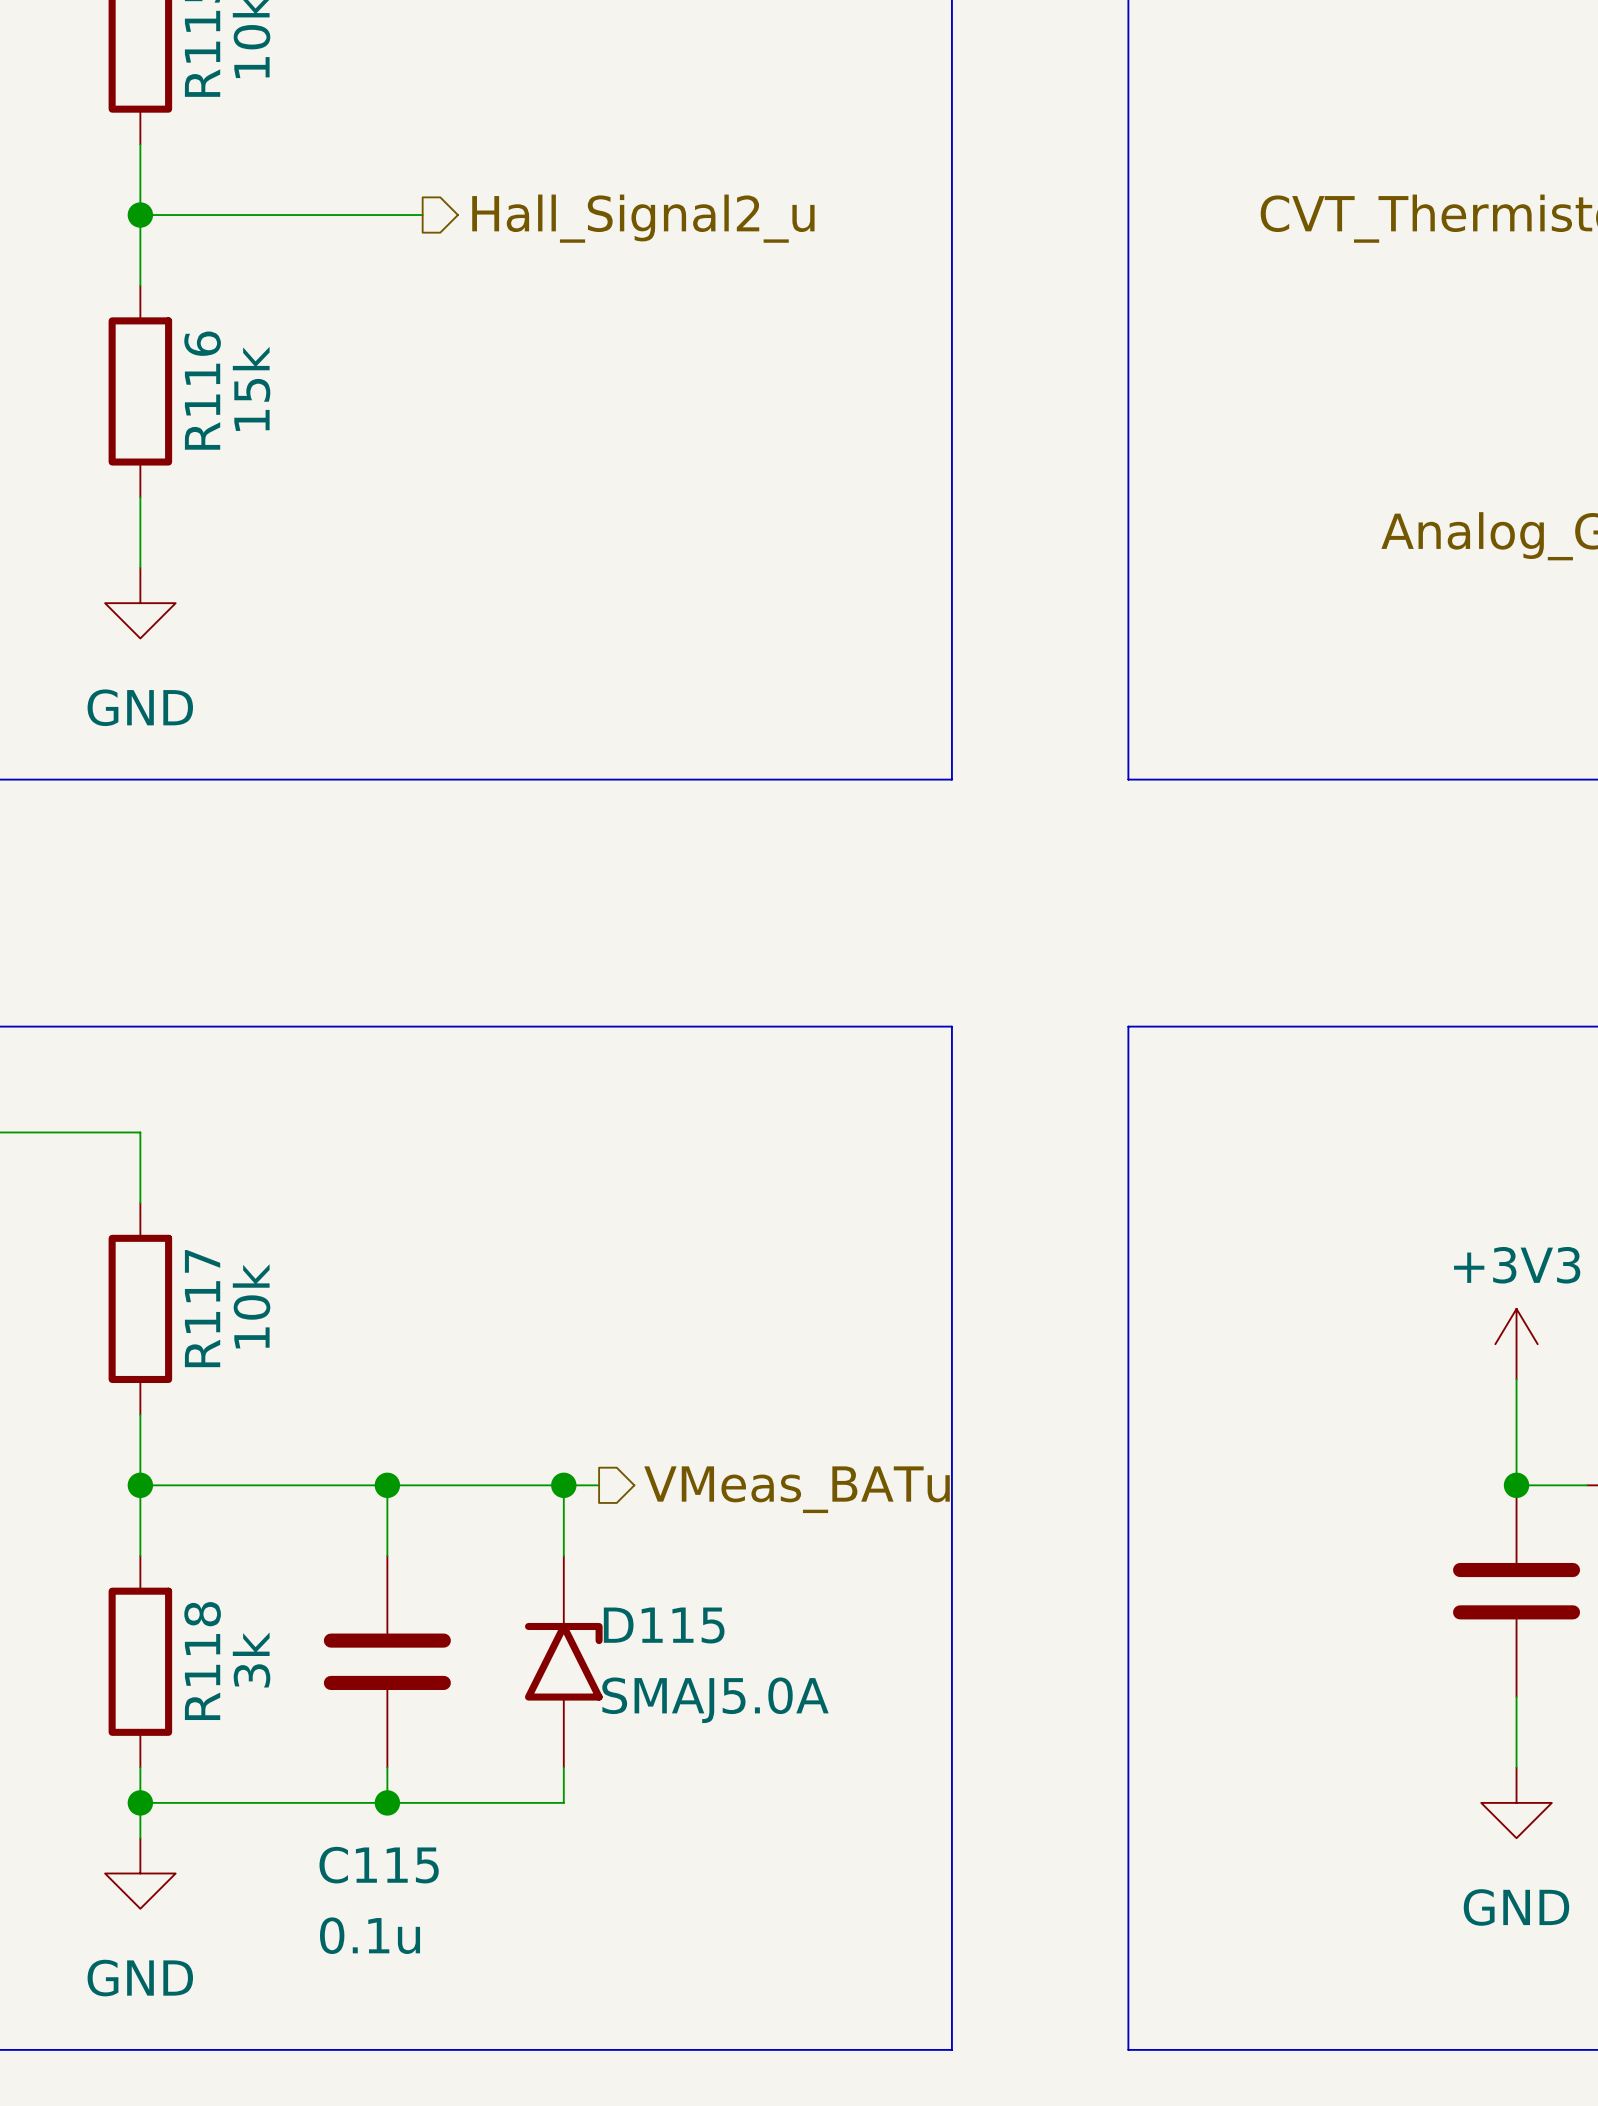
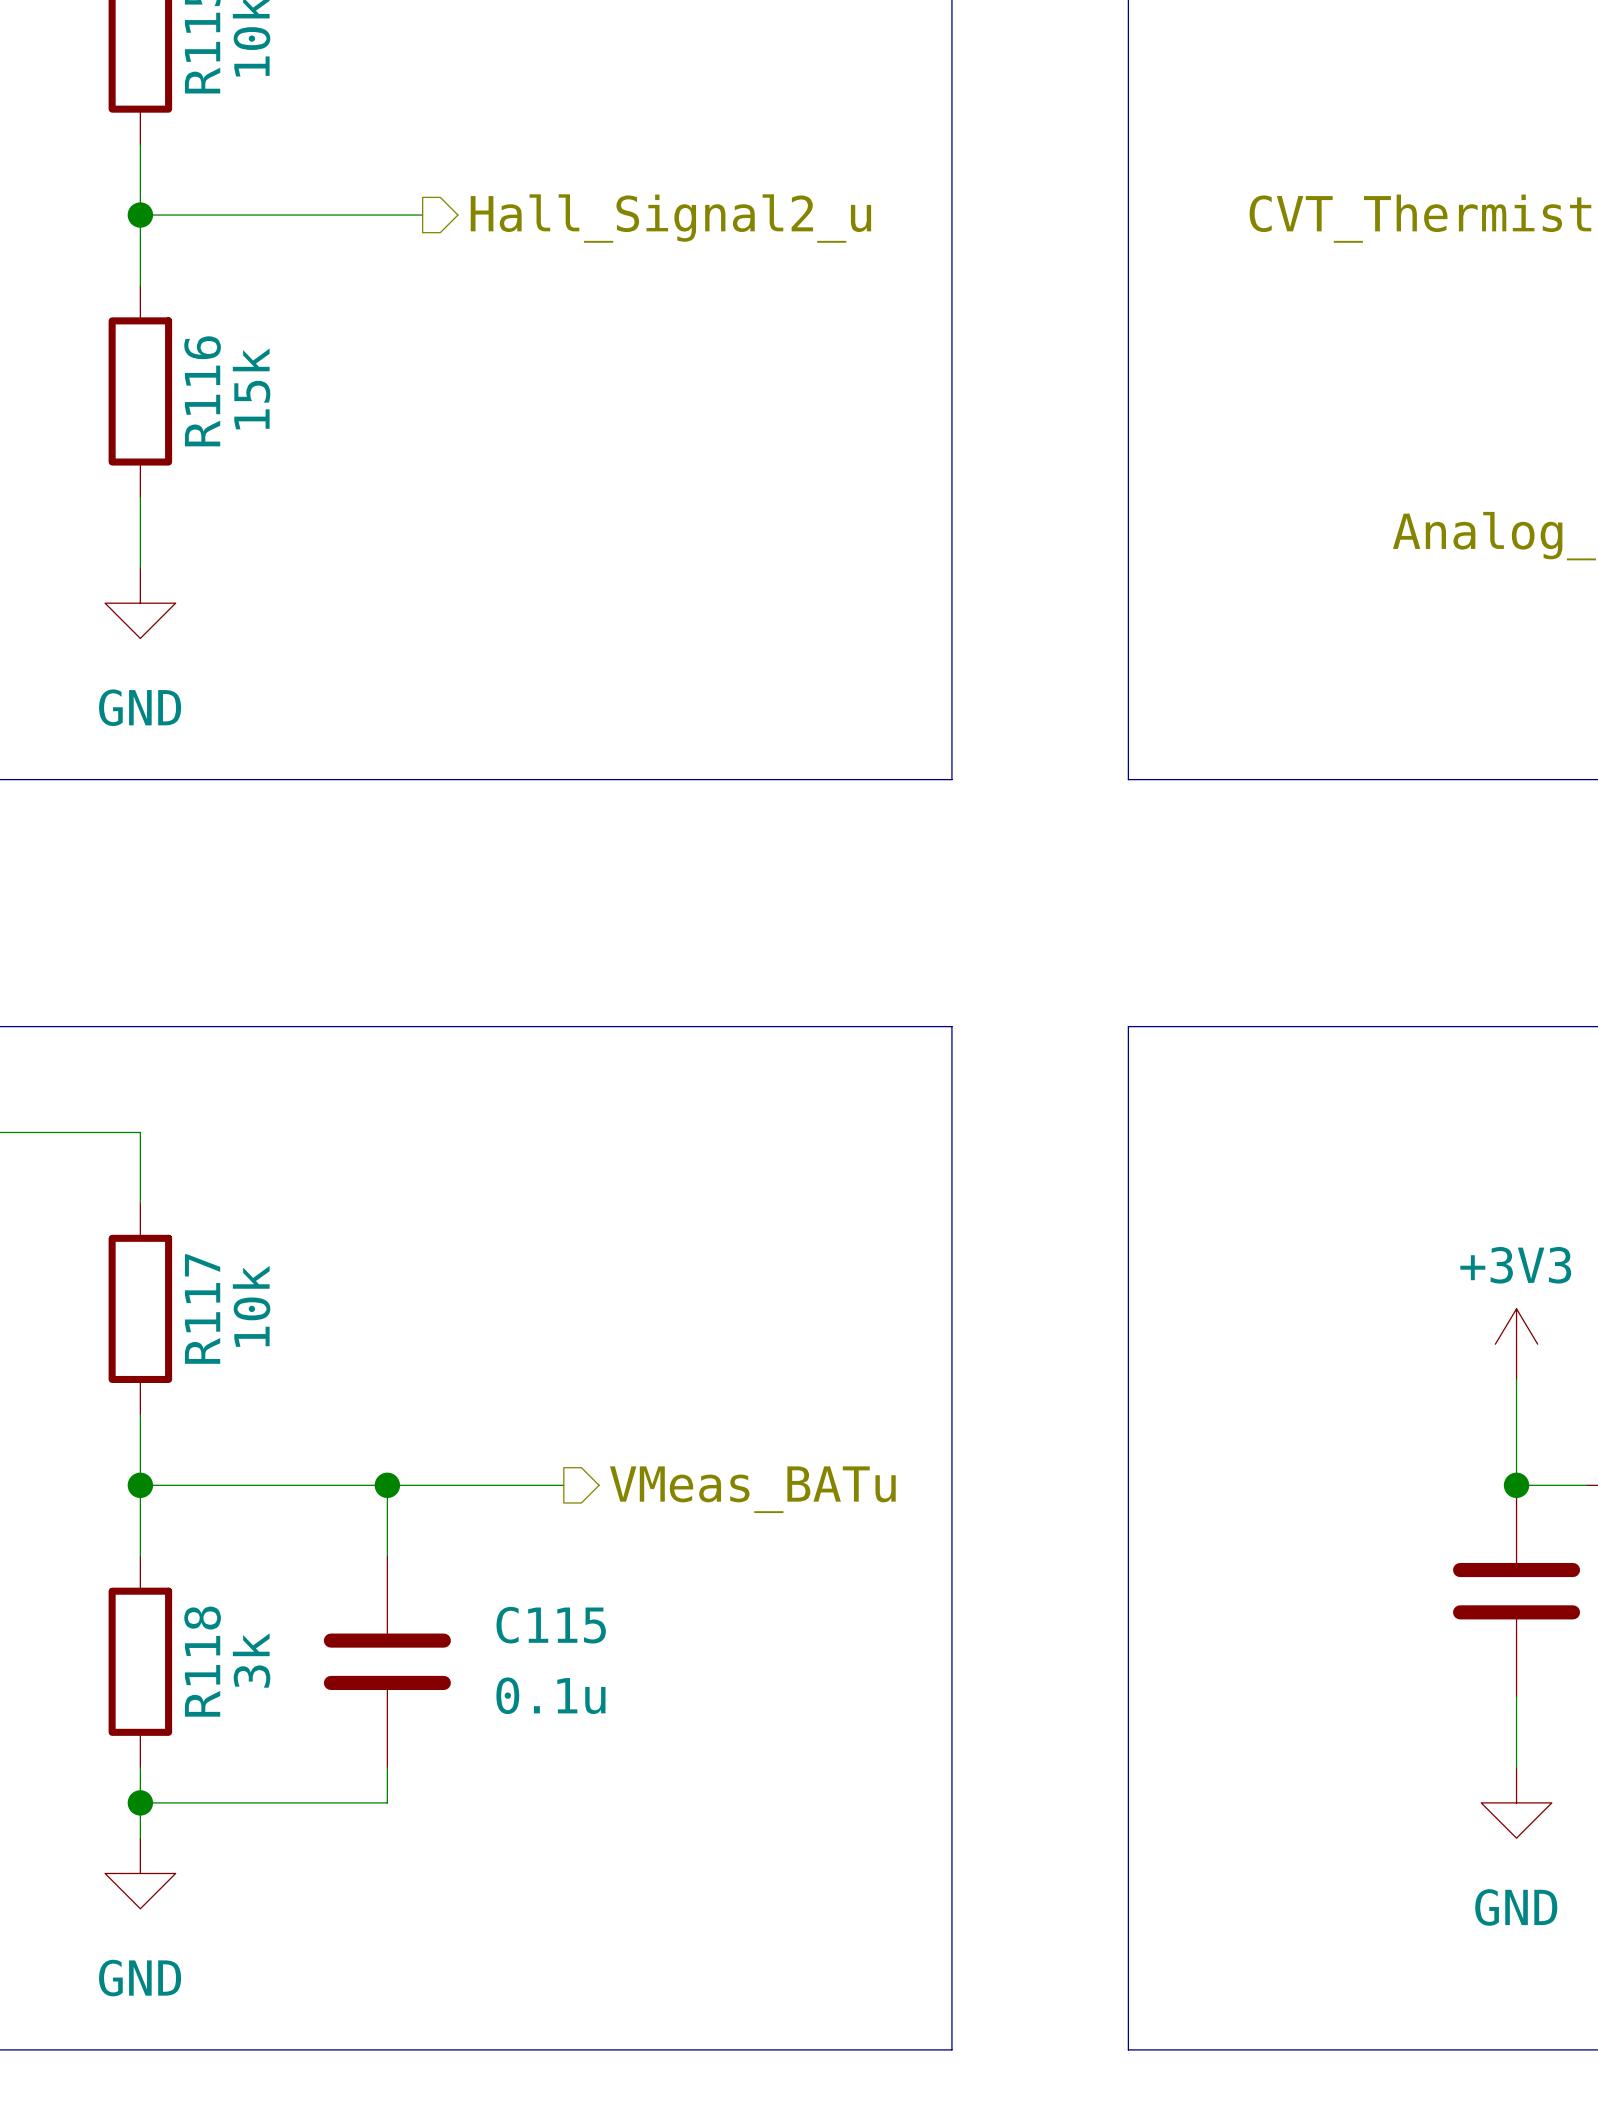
junction: (563, 1485) -> none
wire: (599, 1485) (563, 1485) (563, 1555) -> none
hierarchical label position: VMeas_BATu (797, 1489) -> VMeas_BATu (752, 1489)
D115: SMAJ5.0A (563, 1661) -> none
wire: (563, 1767) (563, 1802) (387, 1802) -> none
junction: (387, 1802) -> none
C115 name position: C115 (379, 1865) -> C115 (551, 1625)
C115 value position: 0.1u (370, 1935) -> 0.1u (550, 1695)

